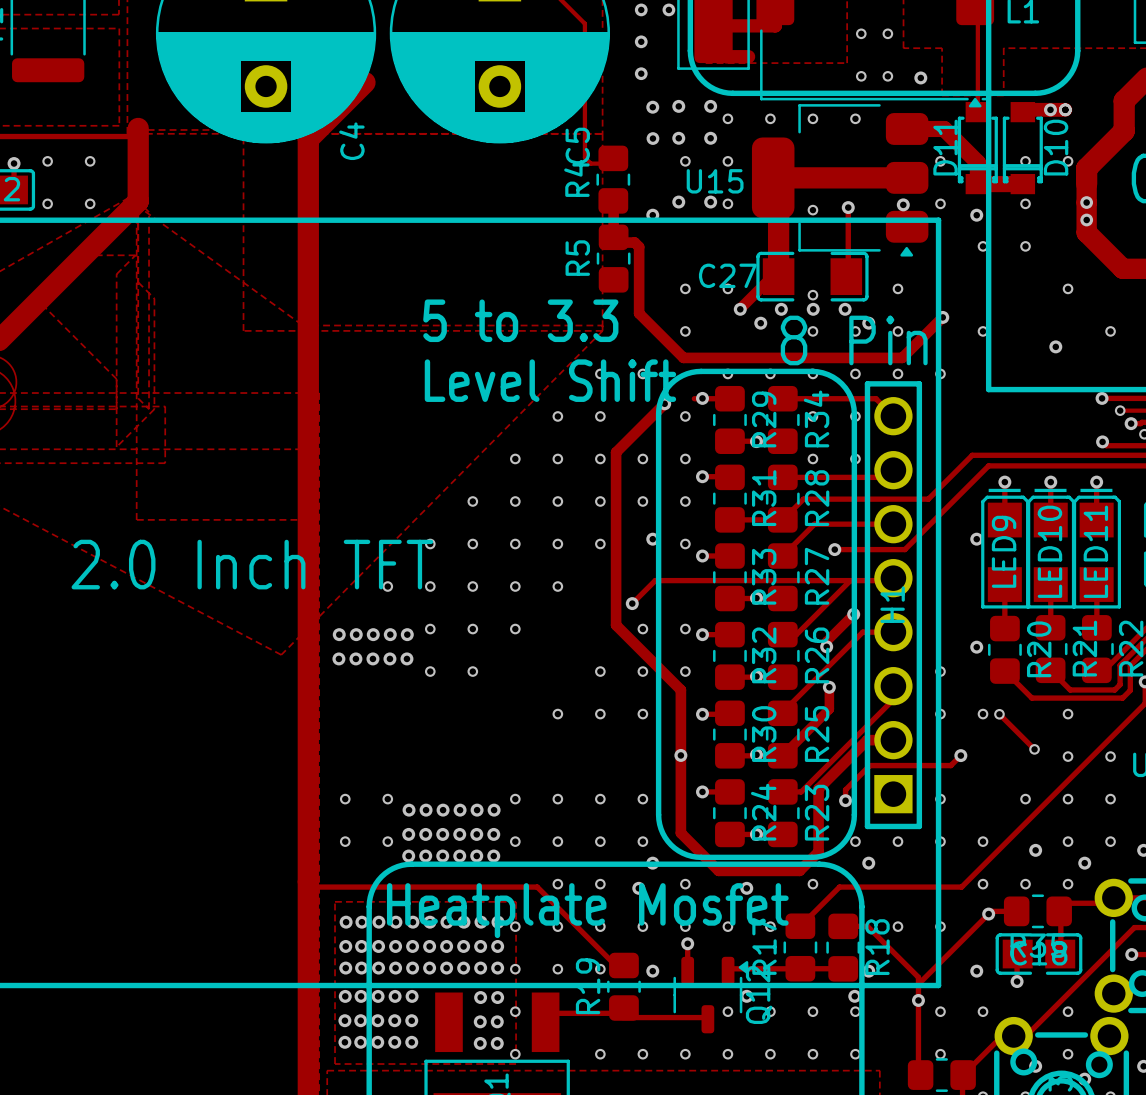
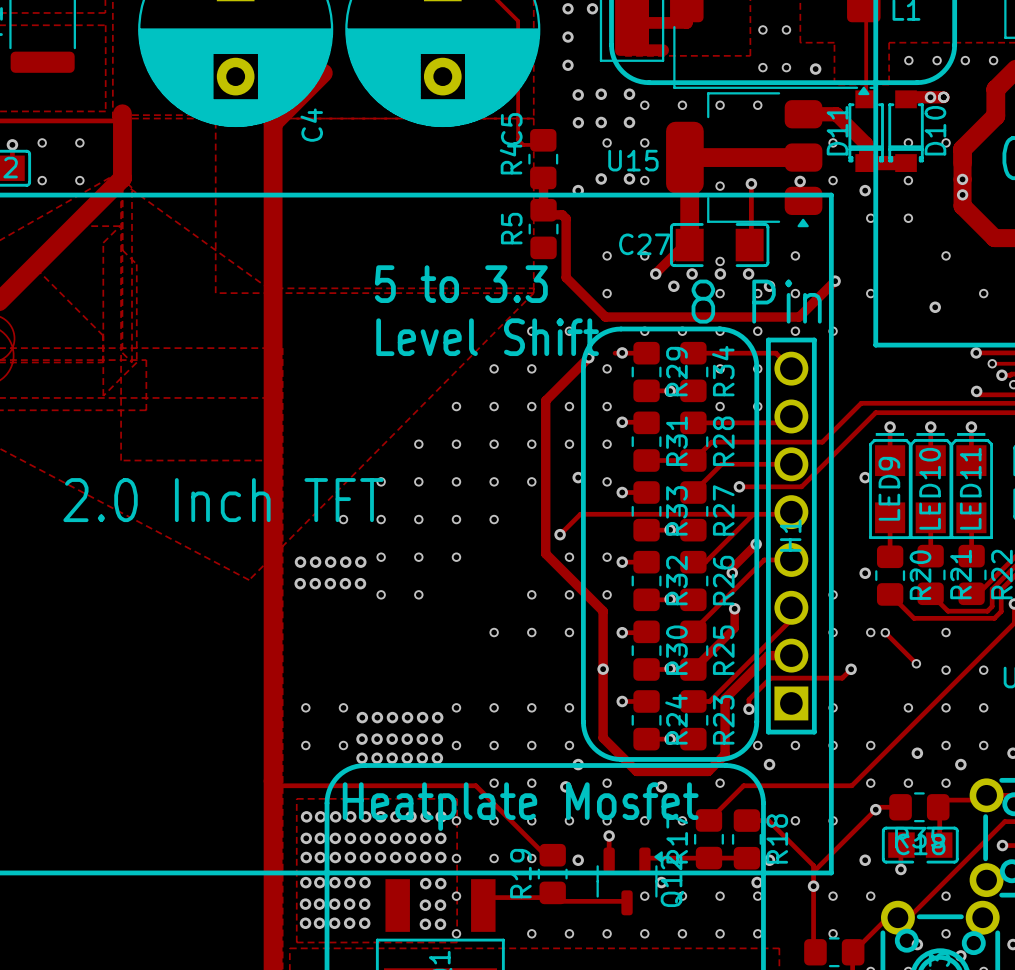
via: none -> (908, 60)
via: none -> (937, 60)
via: none -> (965, 60)
via: none -> (993, 60)

